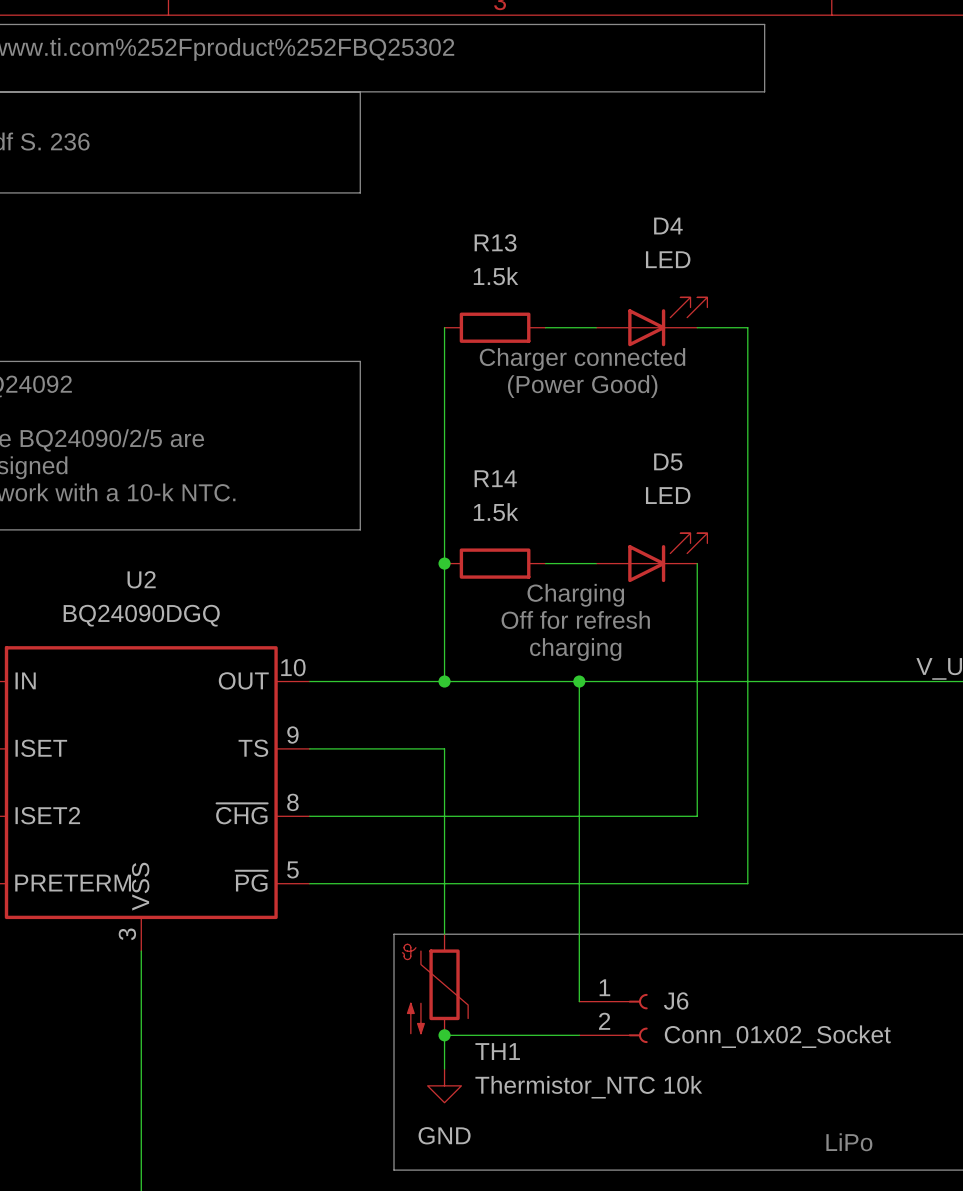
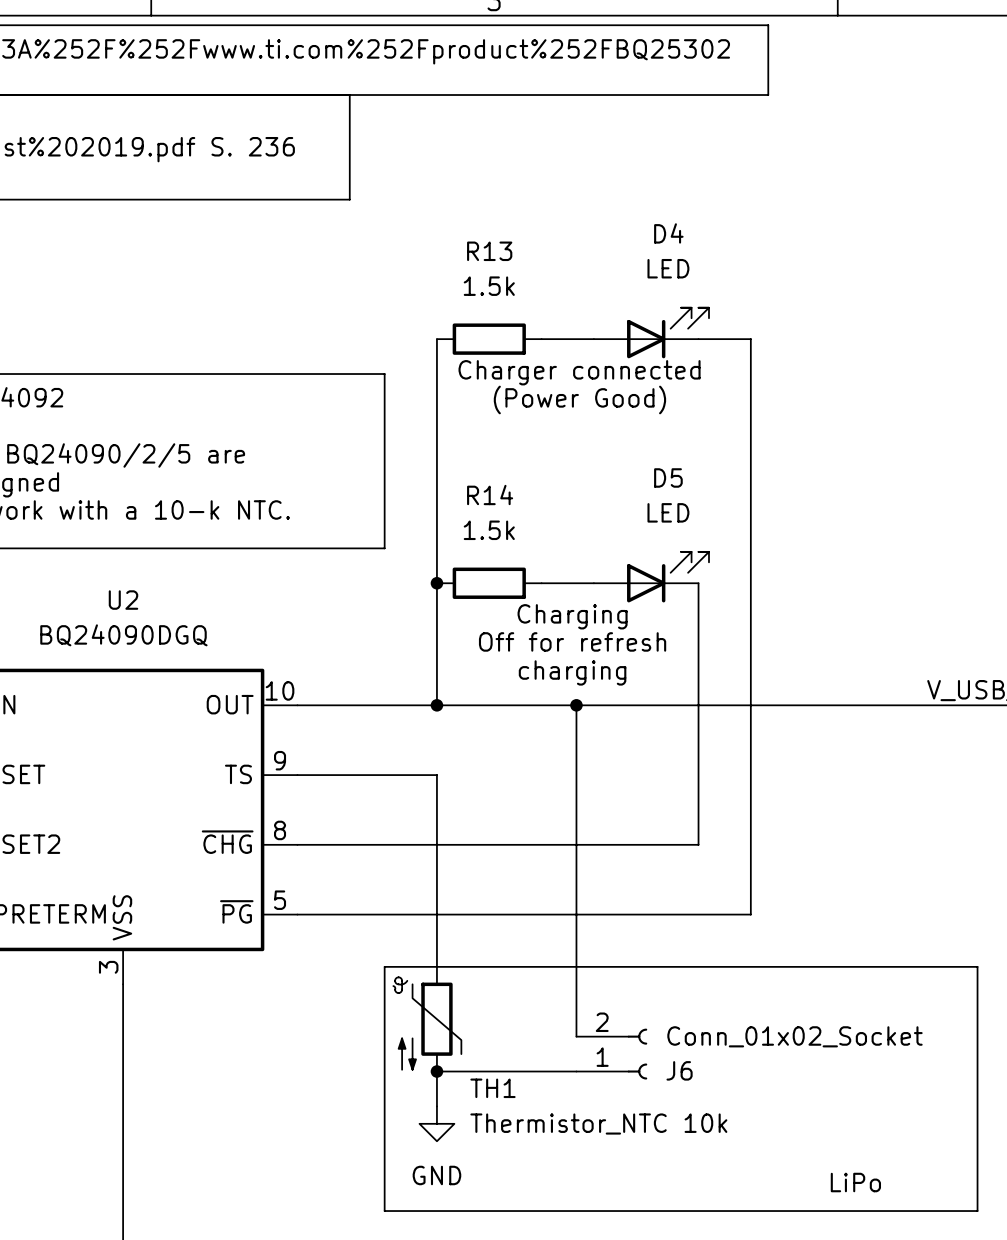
line: (360, 361) (360, 529) -> (349, 374) (384, 374) (384, 548) (349, 548)
J6 flip: as is (638, 1018) -> up-down (637, 1054)

